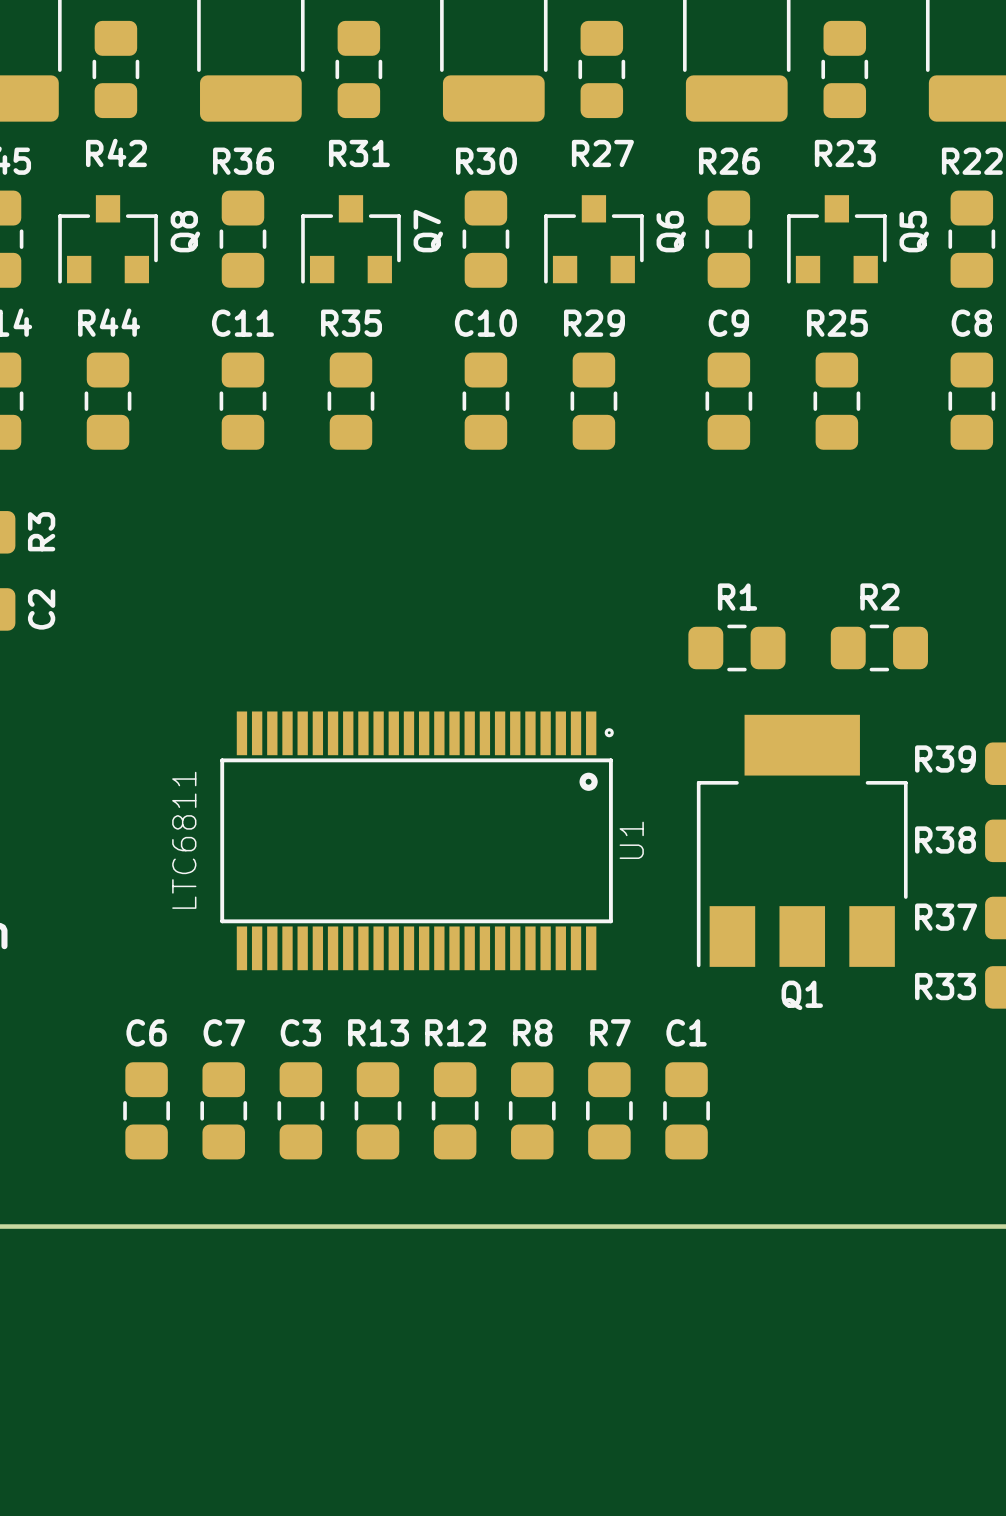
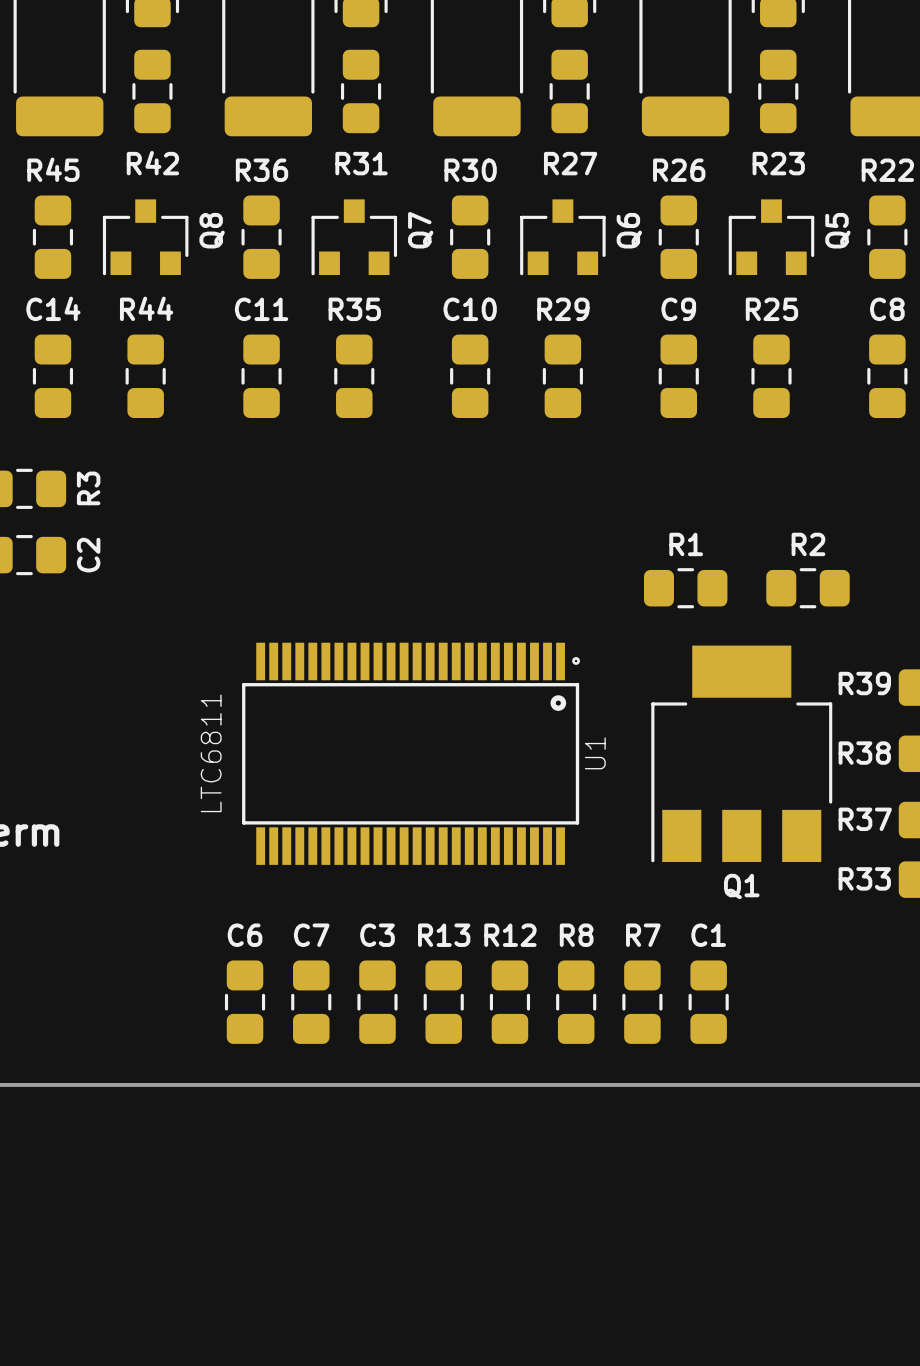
C6 position: (146, 1110) -> (245, 1002)
C7 position: (223, 1110) -> (311, 1002)
C3 position: (300, 1110) -> (377, 1002)
R13 position: (378, 1110) -> (443, 1002)
R12 position: (455, 1110) -> (509, 1002)
R8 position: (532, 1110) -> (576, 1002)
R7 position: (609, 1110) -> (642, 1002)
C1 position: (686, 1110) -> (708, 1002)

